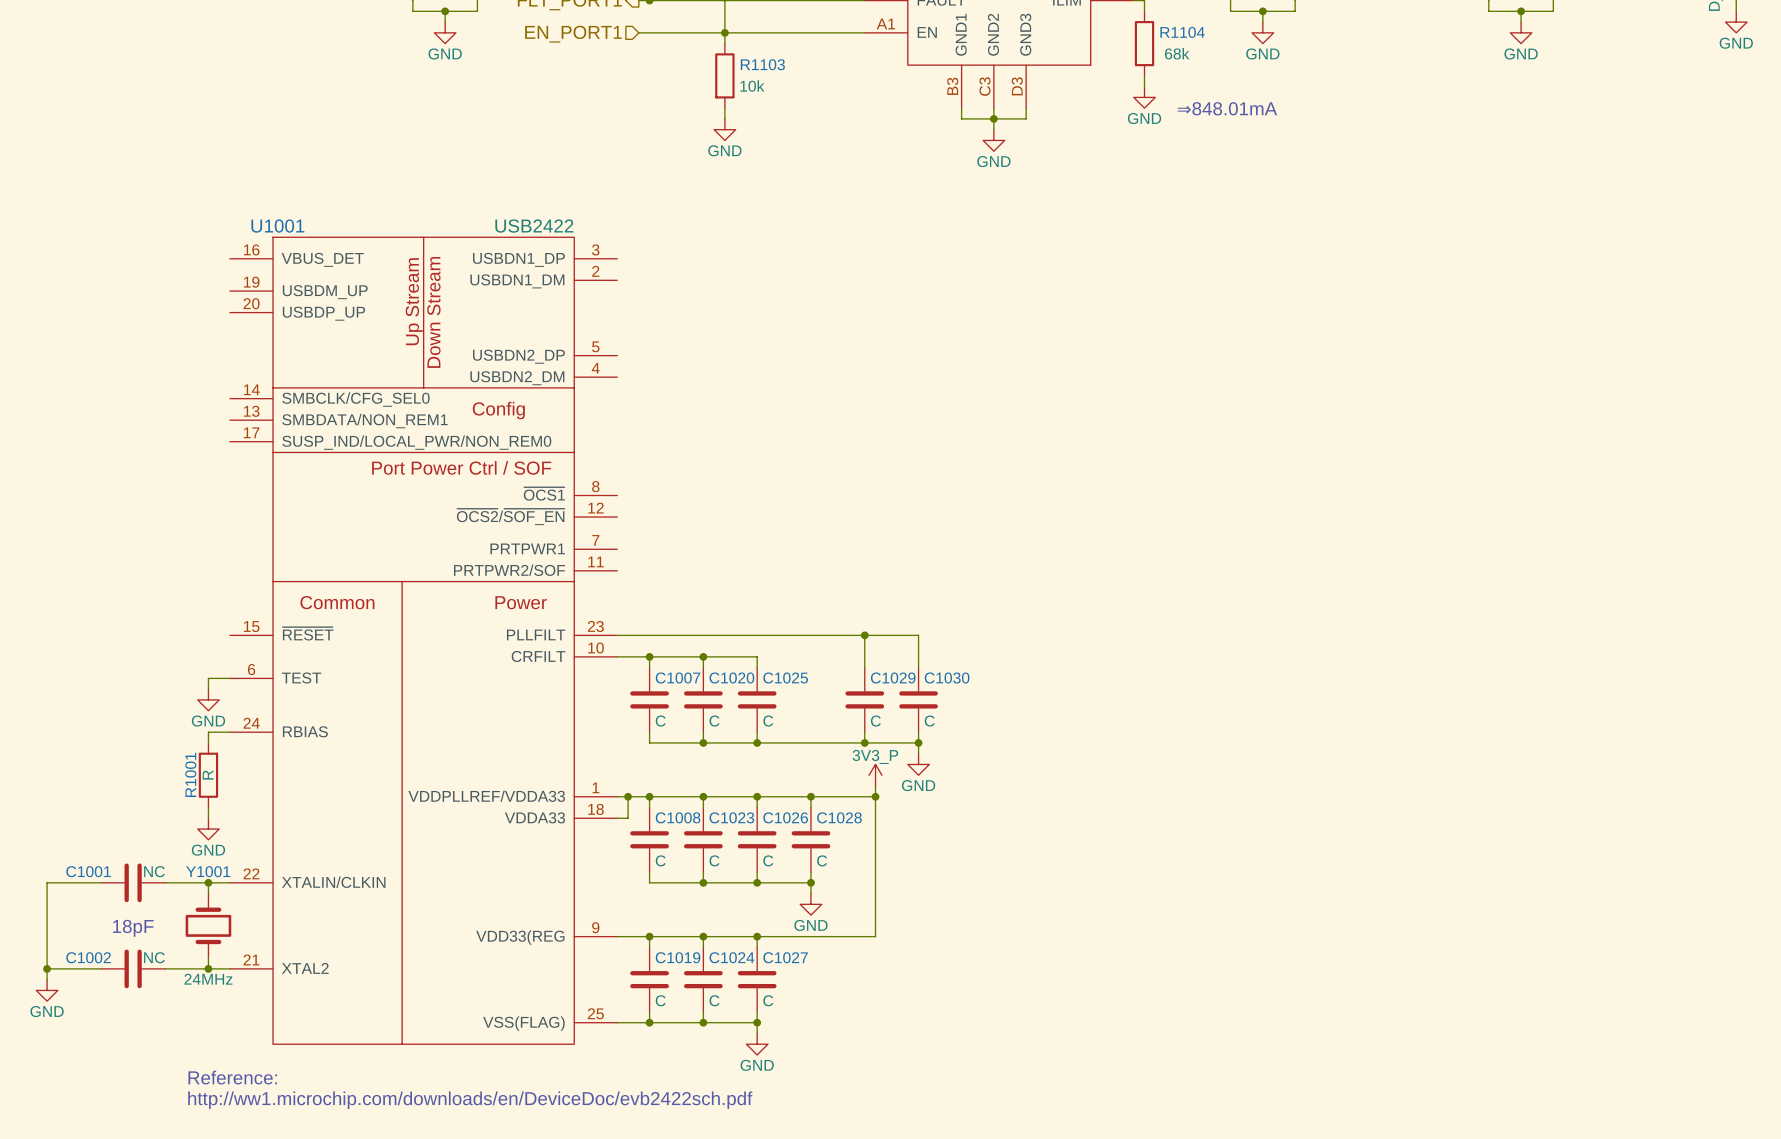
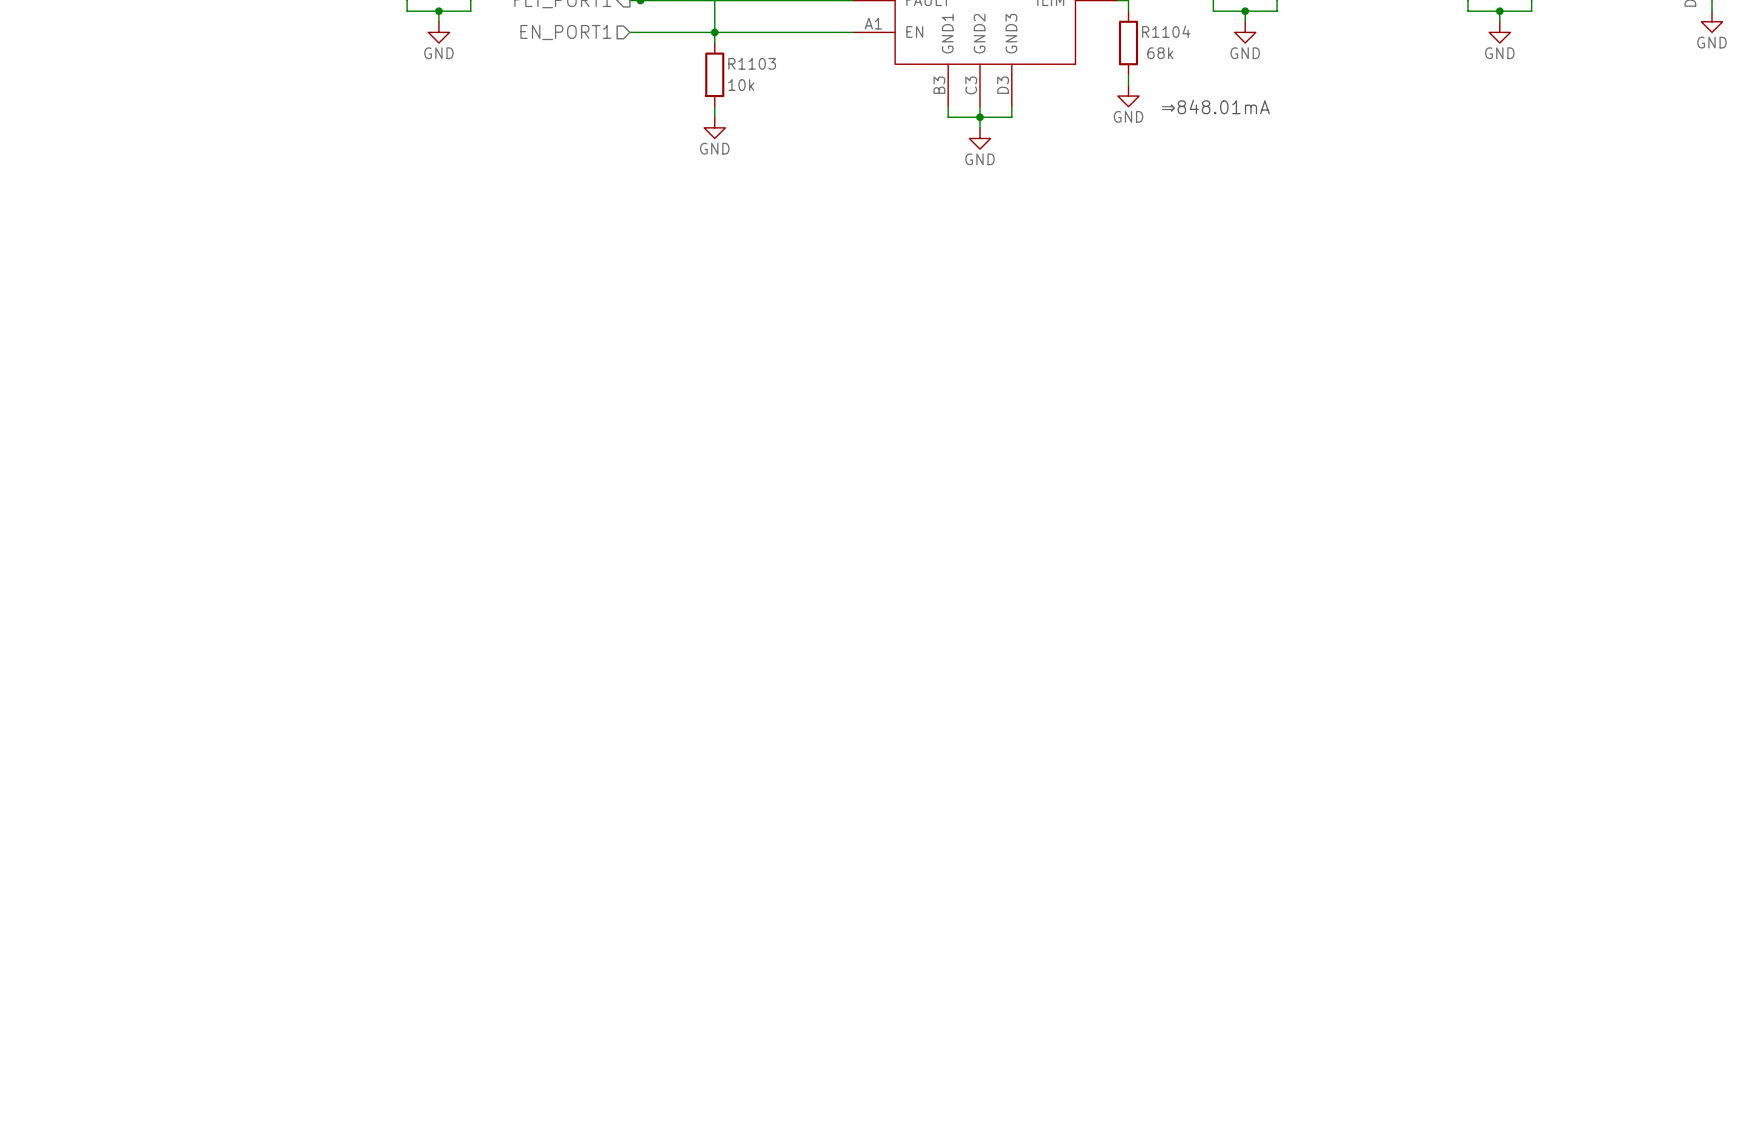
wire: (617, 635) (918, 635) (918, 667) -> none
wire: (864, 635) (864, 667) -> none
junction: (864, 635) -> none
U1001: USB2422 (423, 640) -> none
wire: (617, 656) (757, 656) (757, 667) -> none
wire: (649, 656) (649, 667) -> none
junction: (649, 656) -> none
wire: (703, 656) (703, 667) -> none
junction: (703, 656) -> none
wire: (229, 678) (208, 678) (208, 689) -> none
power symbol: GND (208, 699) -> none
C1007: C (649, 699) -> none
C1020: C (703, 699) -> none
C1025: C (757, 699) -> none
C1029: C (864, 699) -> none
C1030: C (918, 699) -> none
wire: (229, 732) (208, 732) (208, 742) -> none
wire: (649, 732) (649, 742) (918, 742) -> none
wire: (703, 732) (703, 742) -> none
wire: (757, 732) (757, 742) -> none
wire: (864, 732) (864, 742) -> none
wire: (918, 732) (918, 753) -> none
junction: (703, 742) -> none
junction: (757, 742) -> none
junction: (864, 742) -> none
junction: (918, 742) -> none
power symbol: GND (918, 764) -> none
R1001: R (208, 775) -> none
power symbol: 3V3_P (875, 775) -> none
wire: (875, 786) (875, 936) (617, 936) -> none
wire: (617, 796) (875, 796) -> none
wire: (628, 796) (628, 818) (617, 818) -> none
junction: (628, 796) -> none
wire: (649, 796) (649, 807) -> none
junction: (649, 796) -> none
wire: (703, 796) (703, 807) -> none
junction: (703, 796) -> none
wire: (757, 796) (757, 807) -> none
junction: (757, 796) -> none
wire: (810, 796) (810, 807) -> none
junction: (810, 796) -> none
junction: (875, 796) -> none
wire: (208, 807) (208, 818) -> none
power symbol: GND (208, 829) -> none
C1008: C (649, 839) -> none
C1023: C (703, 839) -> none
C1026: C (757, 839) -> none
C1028: C (810, 839) -> none
wire: (649, 872) (649, 882) (810, 882) -> none
wire: (703, 872) (703, 882) -> none
wire: (757, 872) (757, 882) -> none
wire: (810, 872) (810, 893) -> none
wire: (100, 882) (47, 882) (47, 979) -> none
C1001: NC (133, 882) -> none
wire: (165, 882) (229, 882) -> none
wire: (208, 882) (208, 893) -> none
junction: (208, 882) -> none
junction: (703, 882) -> none
junction: (757, 882) -> none
junction: (810, 882) -> none
power symbol: GND (810, 904) -> none
Y1001: 24MHz (208, 925) -> none
text: 18pF (133, 928) -> none
wire: (649, 936) (649, 947) -> none
junction: (649, 936) -> none
wire: (703, 936) (703, 947) -> none
junction: (703, 936) -> none
wire: (757, 936) (757, 947) -> none
junction: (757, 936) -> none
wire: (208, 958) (208, 968) -> none
wire: (47, 968) (100, 968) -> none
junction: (47, 968) -> none
C1002: NC (133, 968) -> none
wire: (165, 968) (229, 968) -> none
junction: (208, 968) -> none
C1019: C (649, 979) -> none
C1024: C (703, 979) -> none
C1027: C (757, 979) -> none
power symbol: GND (47, 990) -> none
wire: (649, 1011) (649, 1022) -> none
wire: (703, 1011) (703, 1022) -> none
wire: (757, 1011) (757, 1033) -> none
wire: (617, 1022) (757, 1022) -> none
junction: (649, 1022) -> none
junction: (703, 1022) -> none
junction: (757, 1022) -> none
power symbol: GND (757, 1044) -> none
text: Reference: (232, 1077) -> none
text: http://ww1.microchip.com/downloads/en/DeviceDoc/evb2422sch.pdf (470, 1100) -> none

